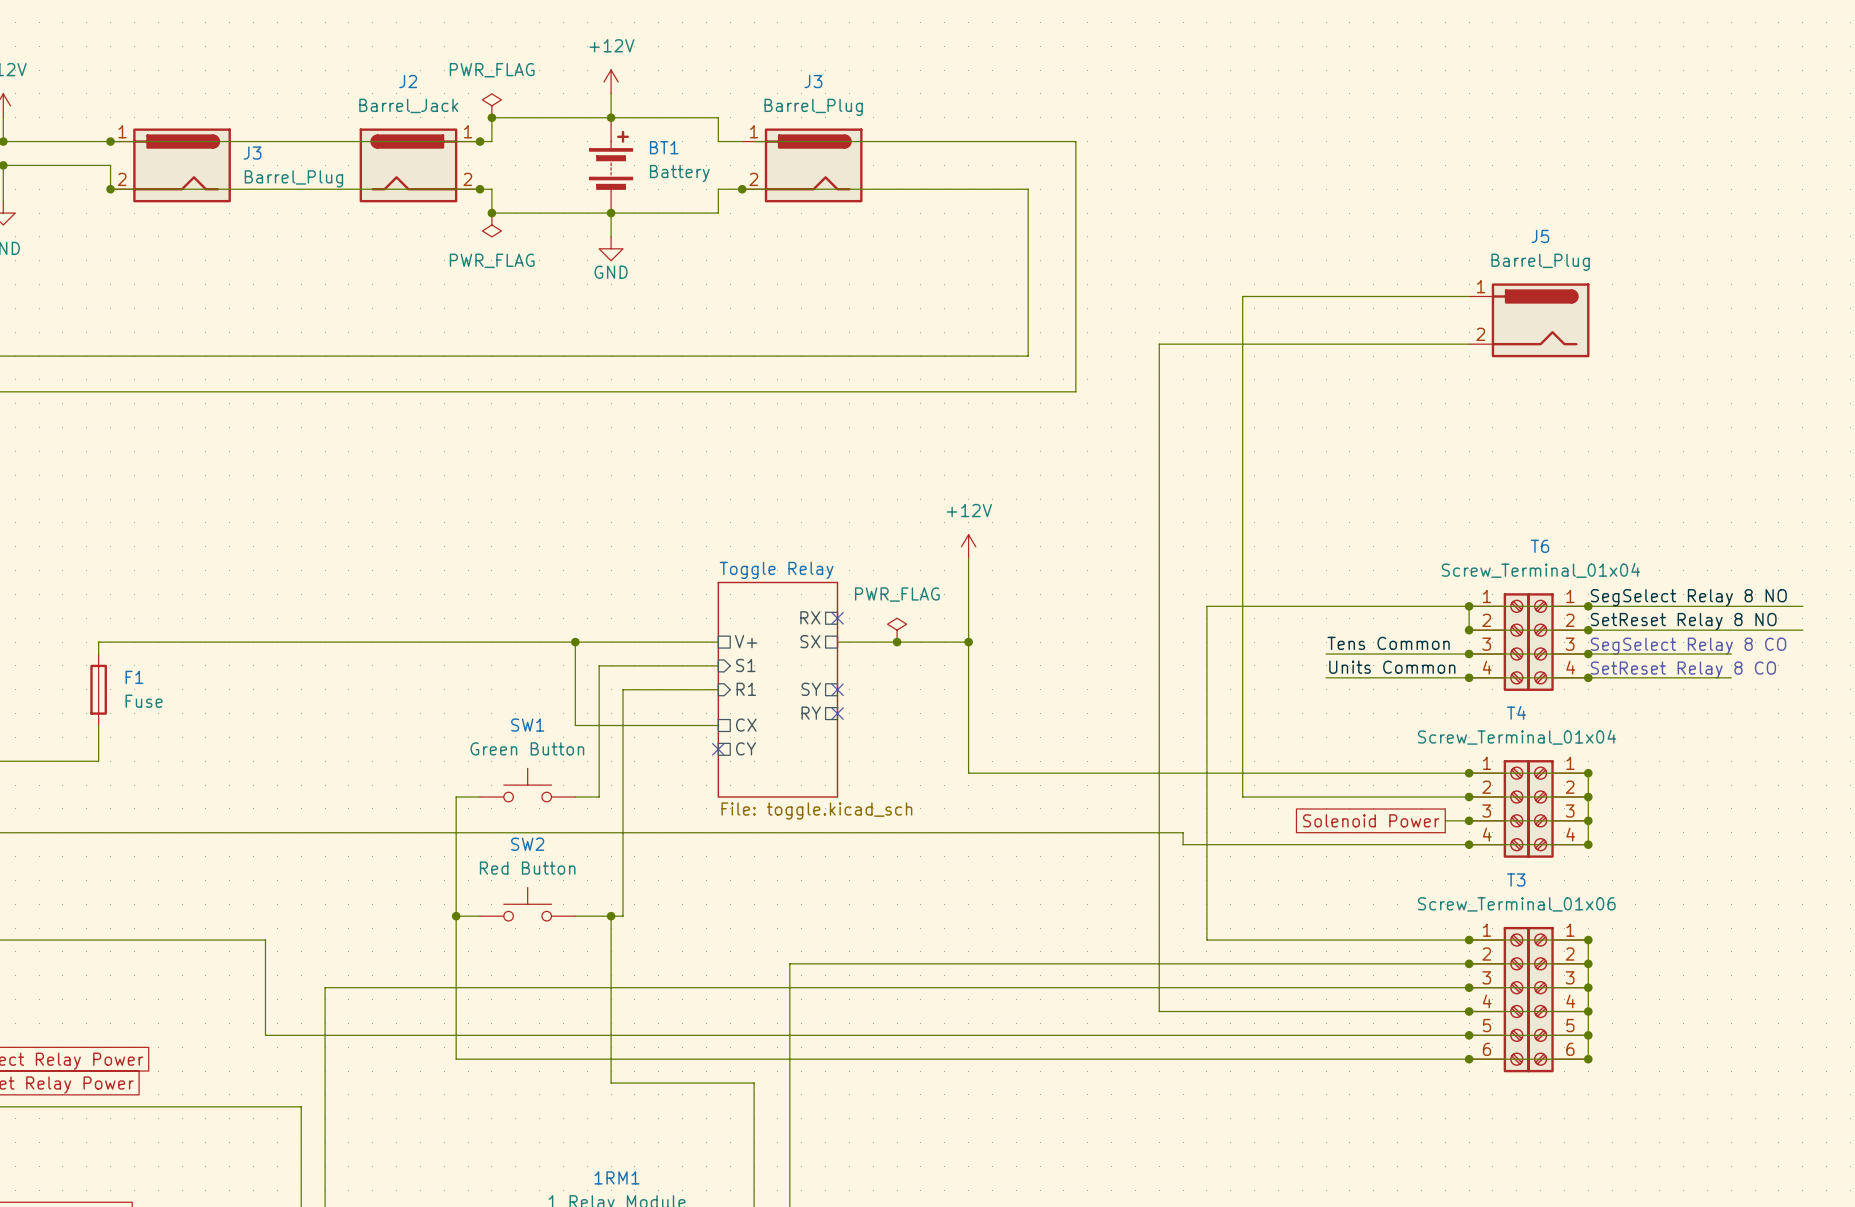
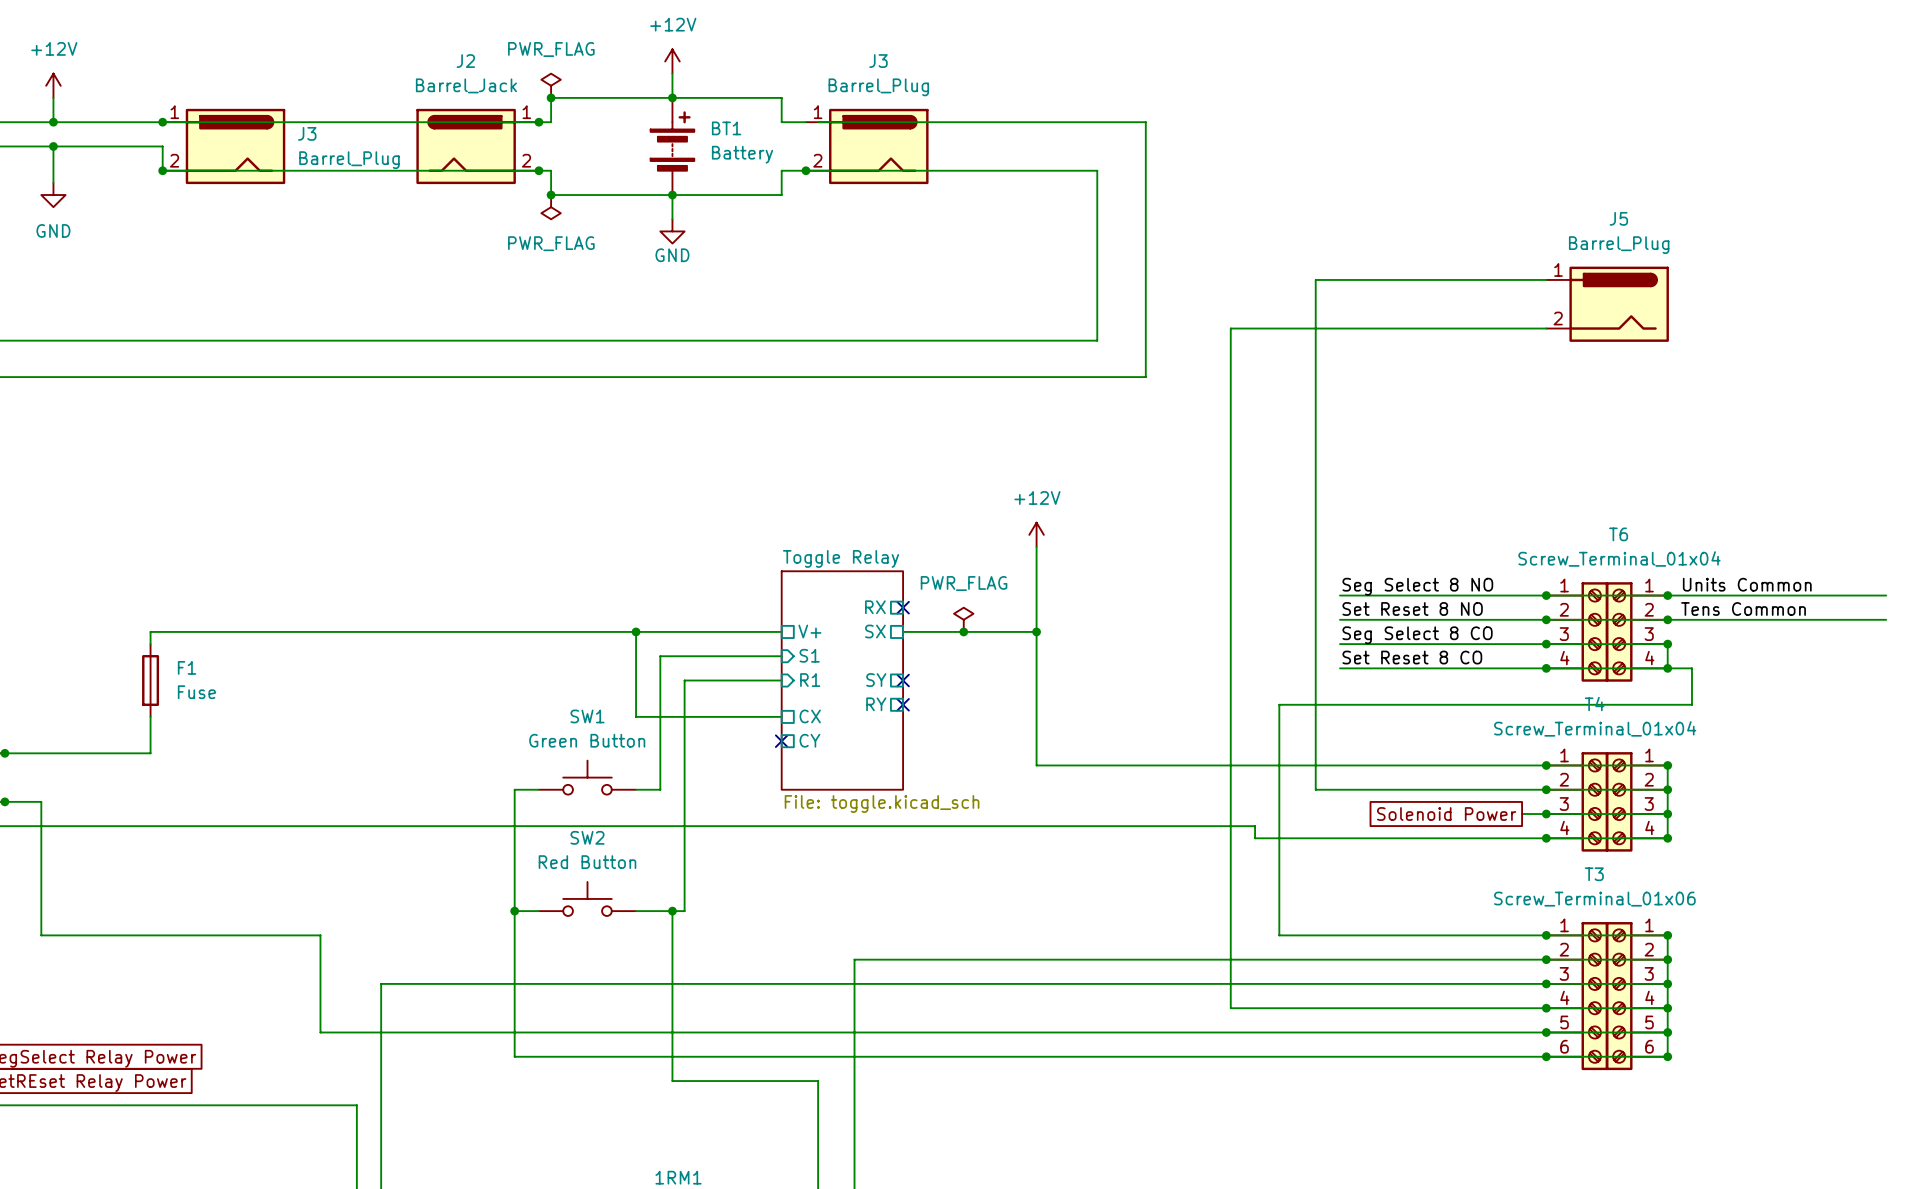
label: none -> Units Common (1747, 584)
label: none -> Seg Select 8 NO (1417, 586)
label: SegSelect Relay 8 NO (1688, 597) -> none
wire: (1266, 606) (1206, 606) (1206, 713) -> (1691, 668) (1691, 704) (1279, 704)
wire: (1469, 606) (1469, 630) -> (1340, 619) (1546, 619)
label: none -> Set Reset 8 NO (1412, 608)
label: none -> Tens Common (1743, 608)
label: SetReset Relay 8 NO (1683, 621) -> none
label: Tens Common (1388, 643) -> none
label: none -> Seg Select 8 CO (1417, 635)
text: SegSelect Relay 8 CO (1688, 646) -> none
wire: none -> (1340, 644) (1400, 644)
wire: (1588, 654) (1731, 654) -> (1667, 644) (1667, 668)
label: none -> Set Reset 8 CO (1412, 657)
label: Units Common (1392, 667) -> none
text: SetReset Relay 8 CO (1683, 670) -> none
wire: none -> (1340, 668) (1400, 668)
wire: (1612, 677) (1731, 677) -> none

